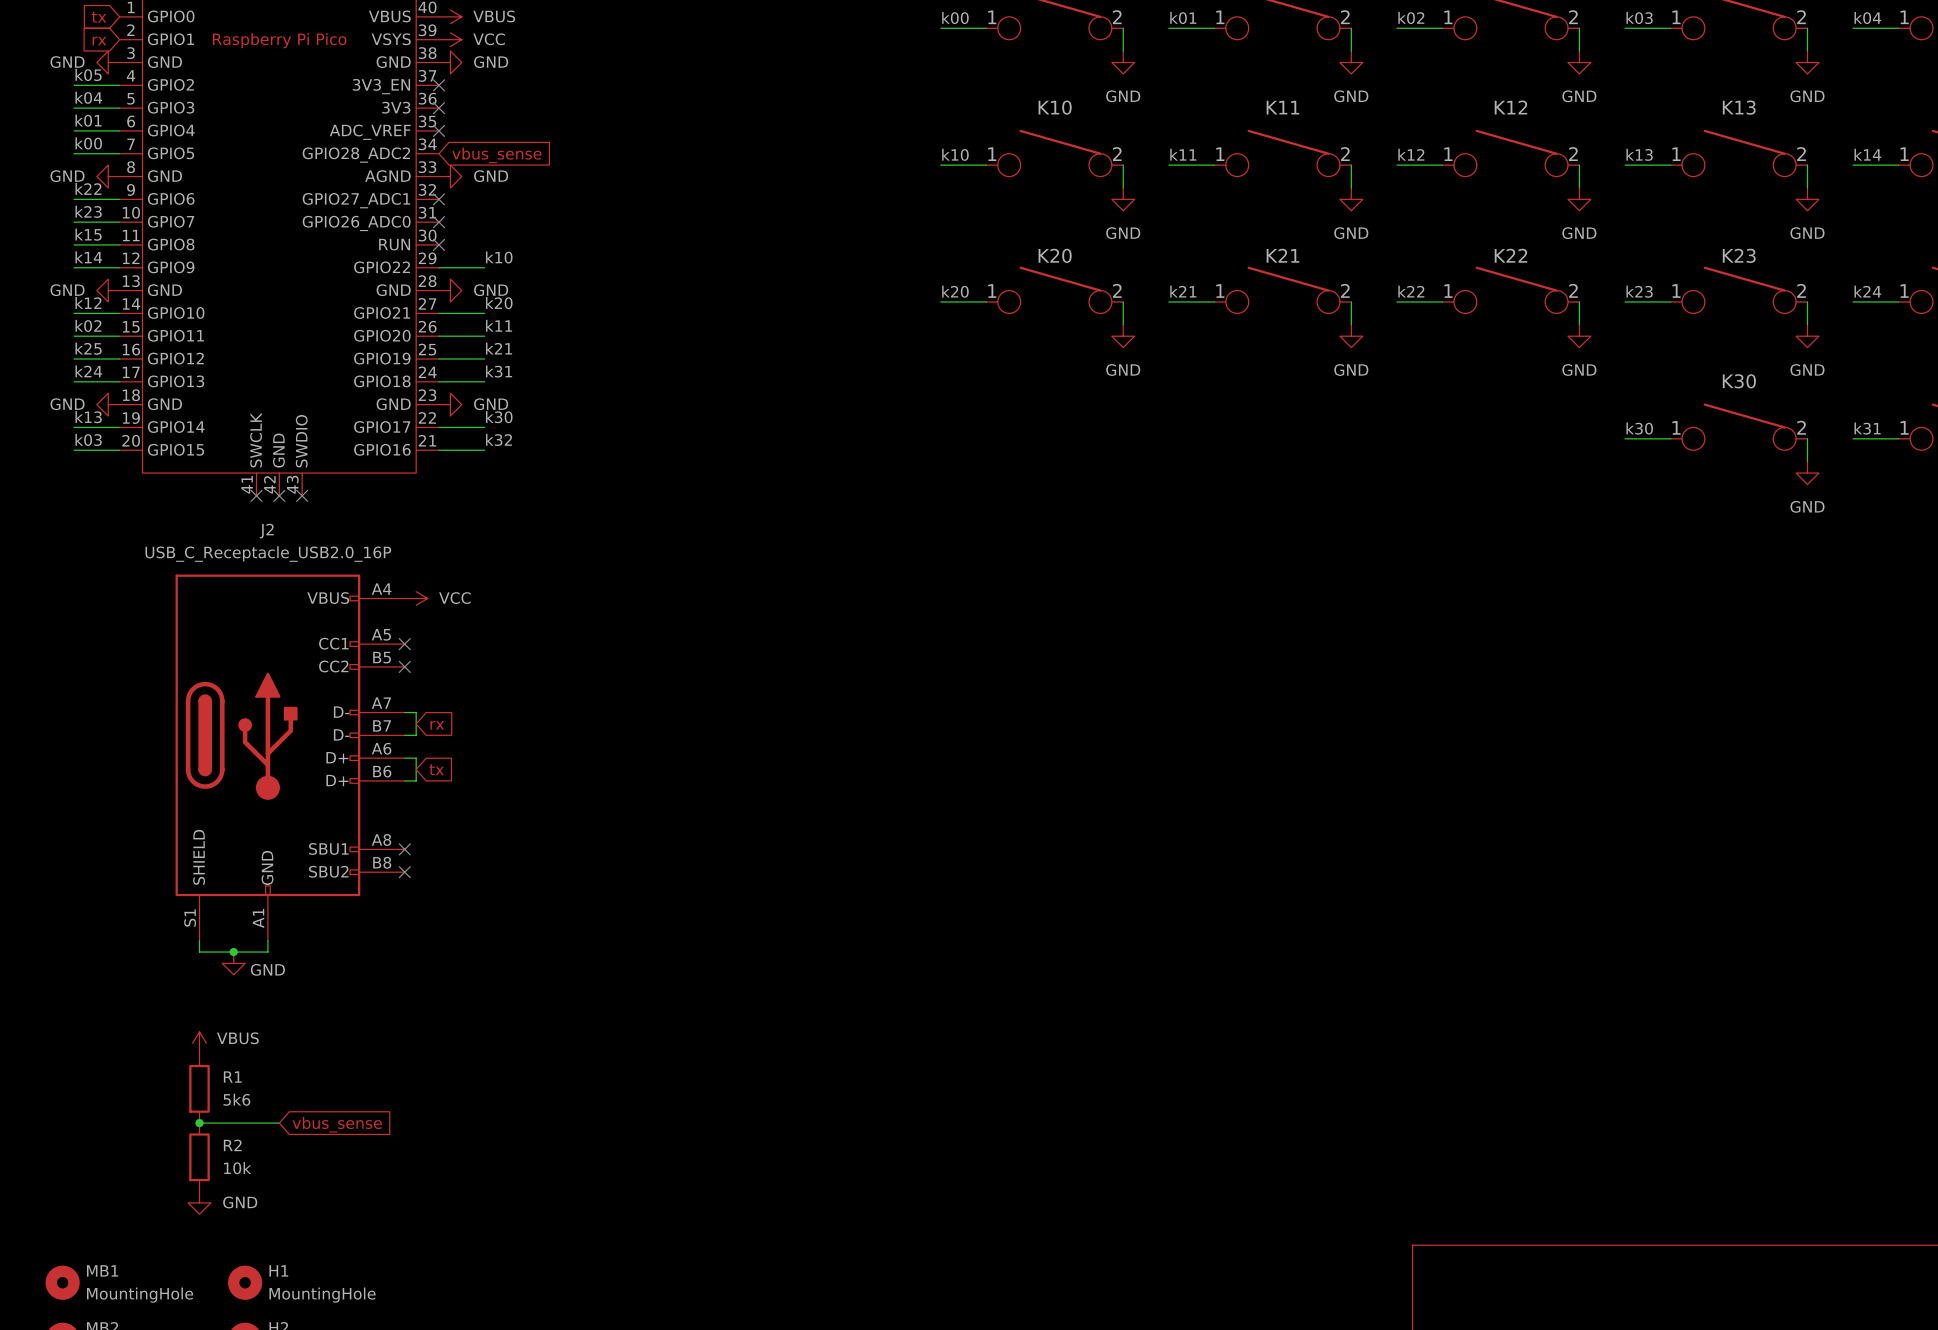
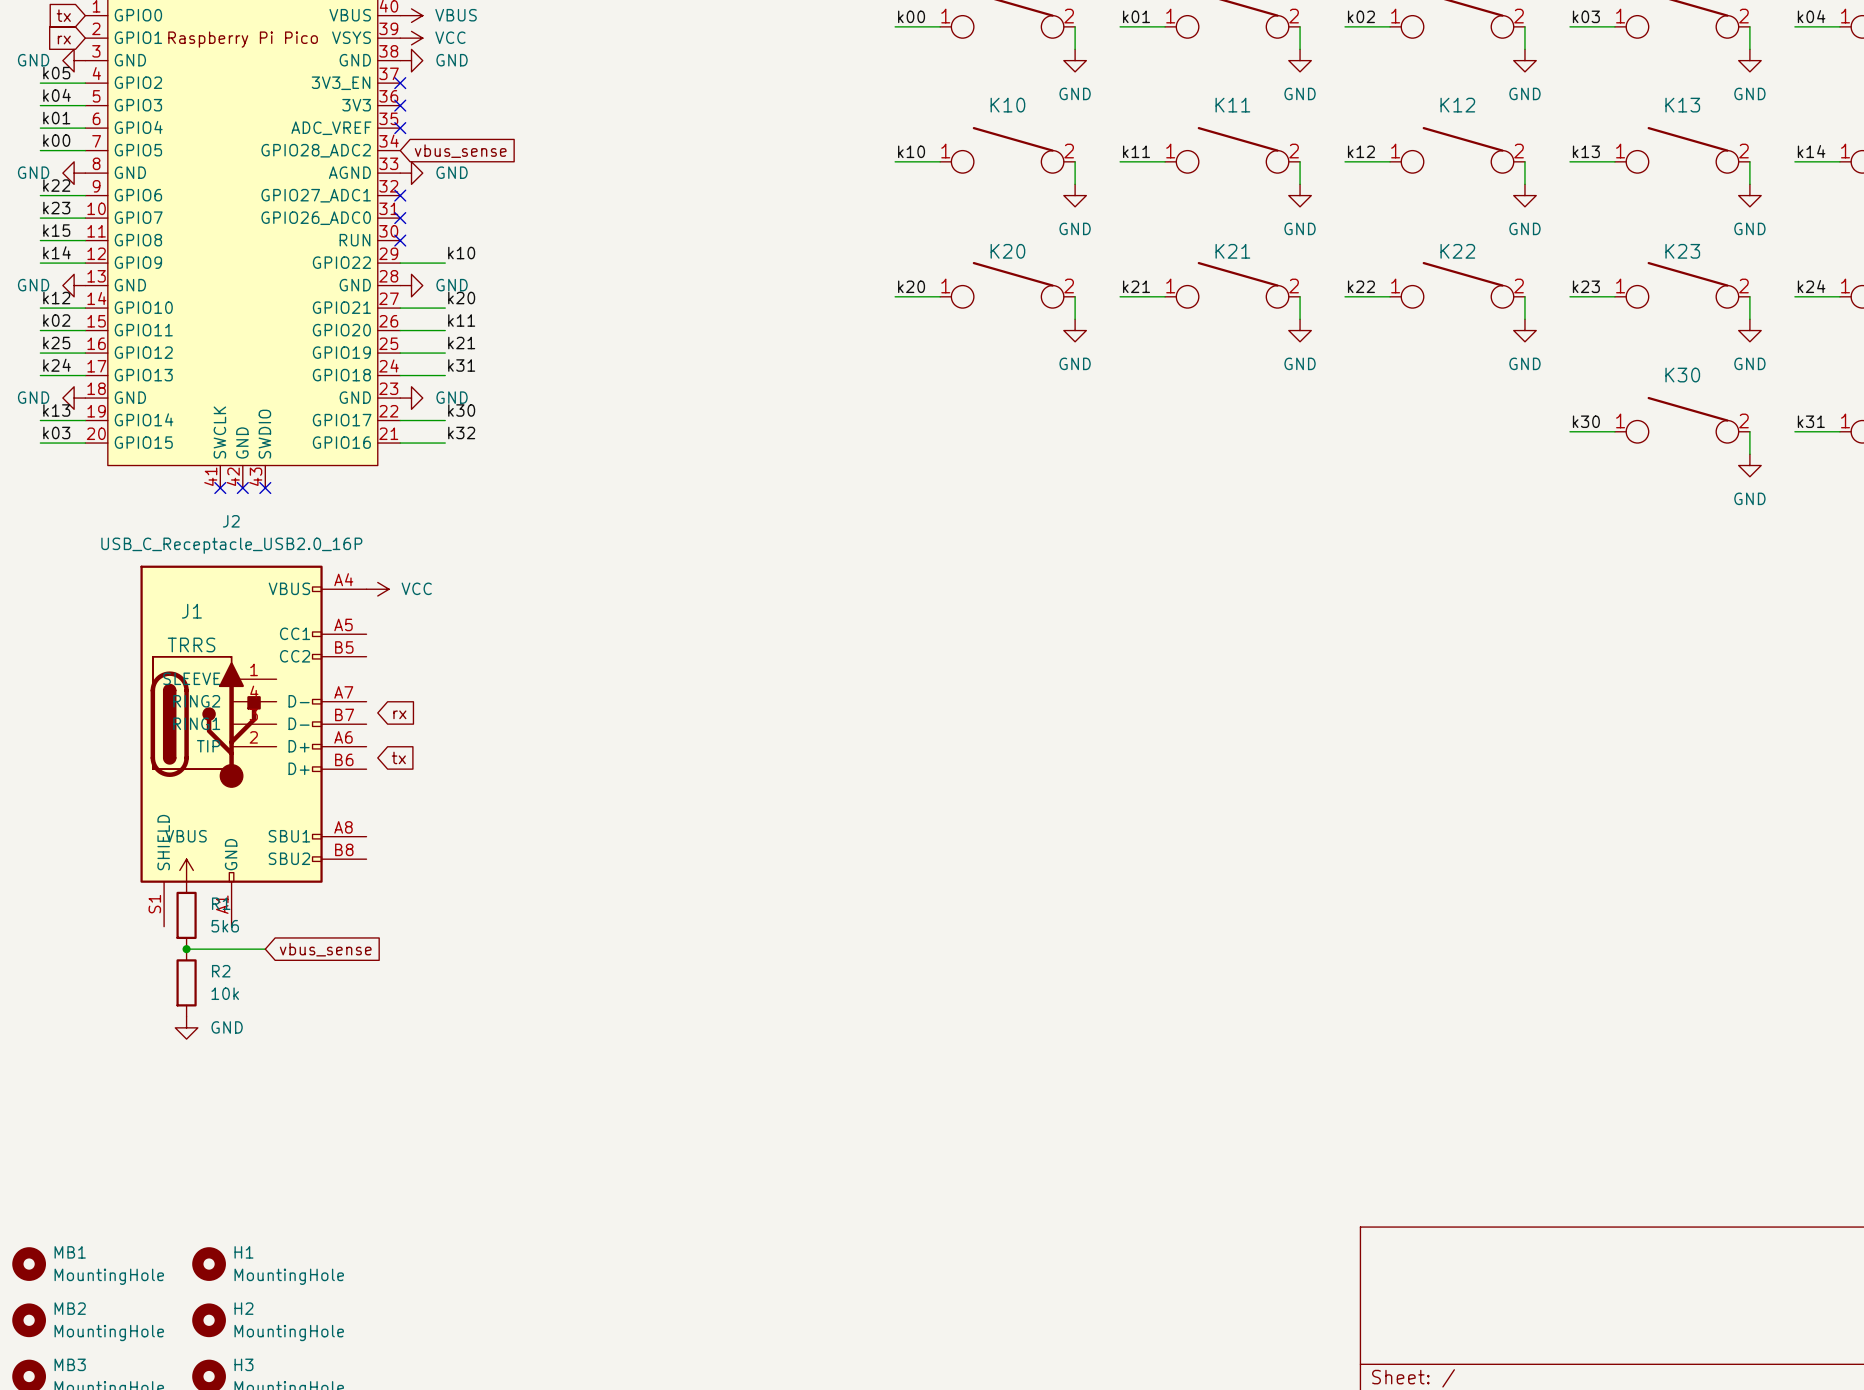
no-connect mark: (404, 644) -> none
no-connect mark: (404, 666) -> none
wire: (404, 712) (416, 712) (416, 735) (404, 735) -> none
J1: none -> TRRS (214, 712)
wire: (404, 758) (416, 758) (416, 780) (404, 780) -> none
no-connect mark: (404, 849) -> none
no-connect mark: (404, 872) -> none
wire: (199, 940) (199, 952) (267, 952) (267, 940) -> none
junction position: (233, 952) -> (186, 949)
power symbol: GND (233, 963) -> none
power symbol text position: VBUS (237, 1038) -> VBUS (186, 836)
power symbol position: VBUS (199, 1043) -> VBUS (186, 870)
power symbol: none -> GND (186, 1027)
R1 position: (199, 1088) -> (186, 915)
wire: (199, 1123) (279, 1123) -> (186, 949) (265, 949)
junction: (199, 1123) -> none
global label position: vbus_sense (337, 1124) -> vbus_sense (325, 949)
R2 position: (199, 1157) -> (186, 982)
power symbol: GND (199, 1202) -> none

